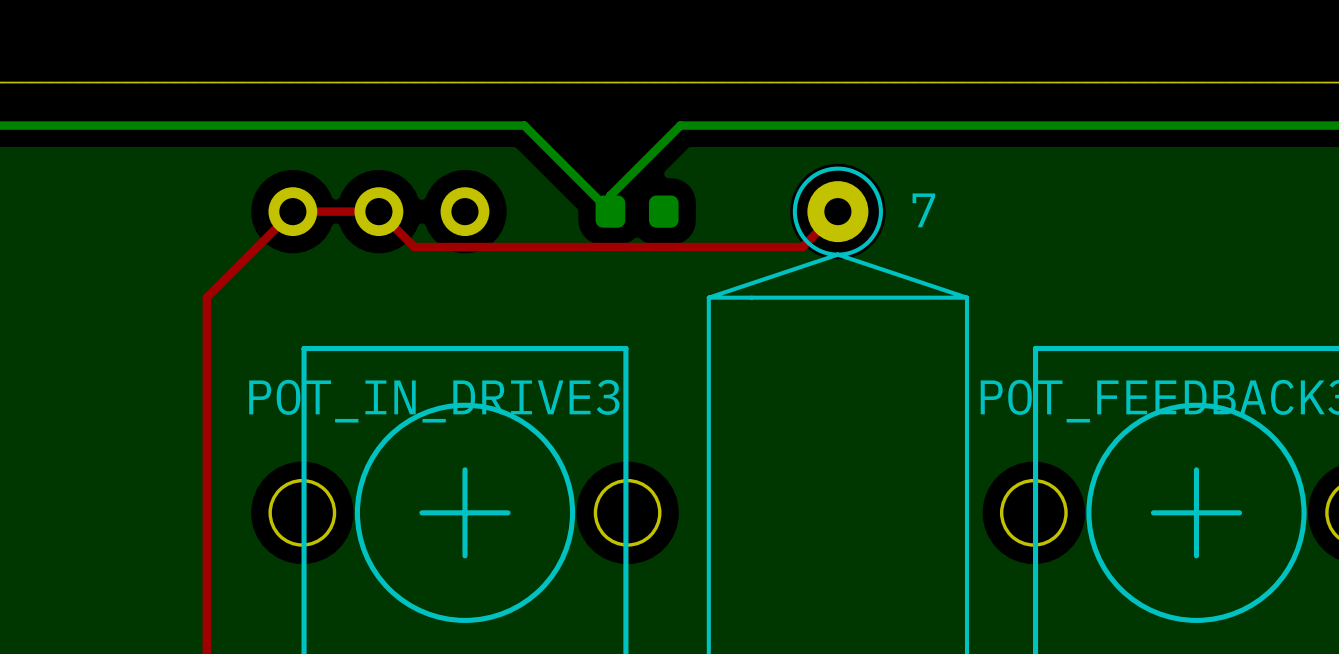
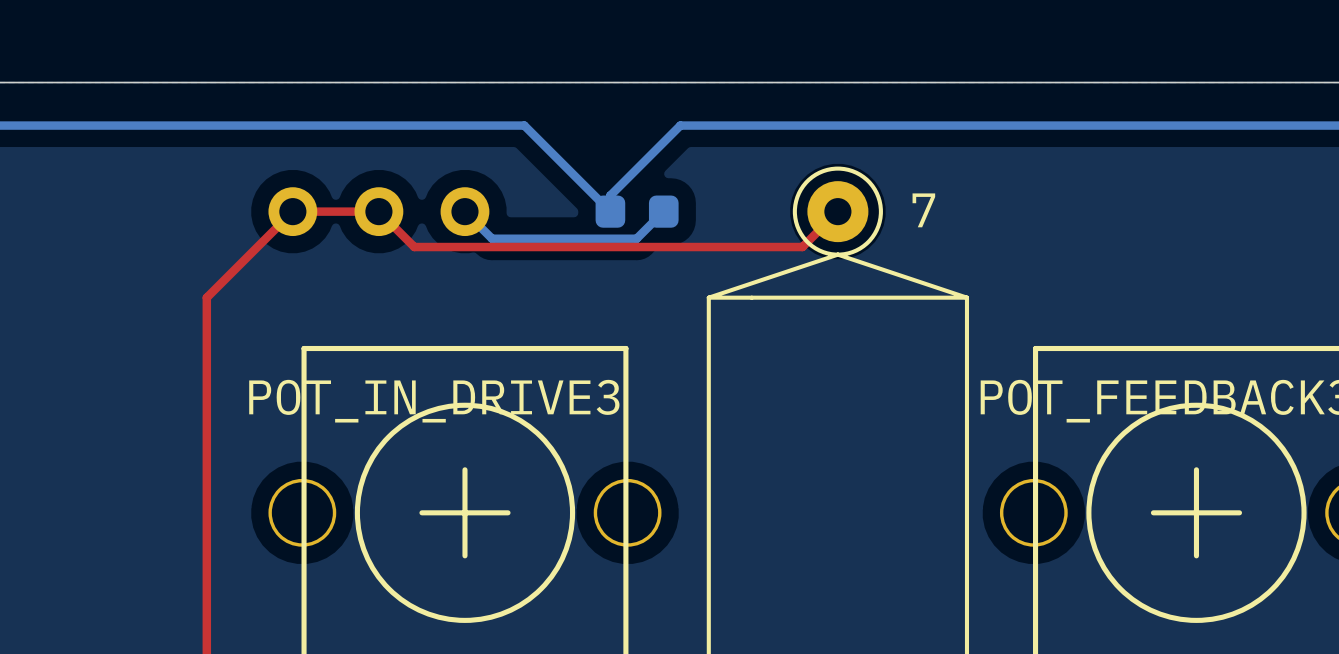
bottom track: none -> (464, 211) (492, 238) (636, 238) (663, 211)

